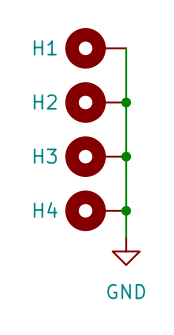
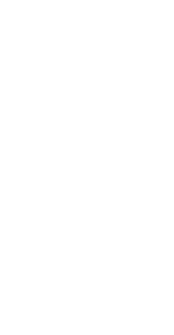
H1: (95, 48) -> none
wire: (126, 48) (126, 237) -> none
H2: (95, 102) -> none
junction: (126, 102) -> none
H3: (95, 156) -> none
junction: (126, 156) -> none
H4: (95, 210) -> none
junction: (126, 210) -> none
power symbol: GND (126, 251) -> none

